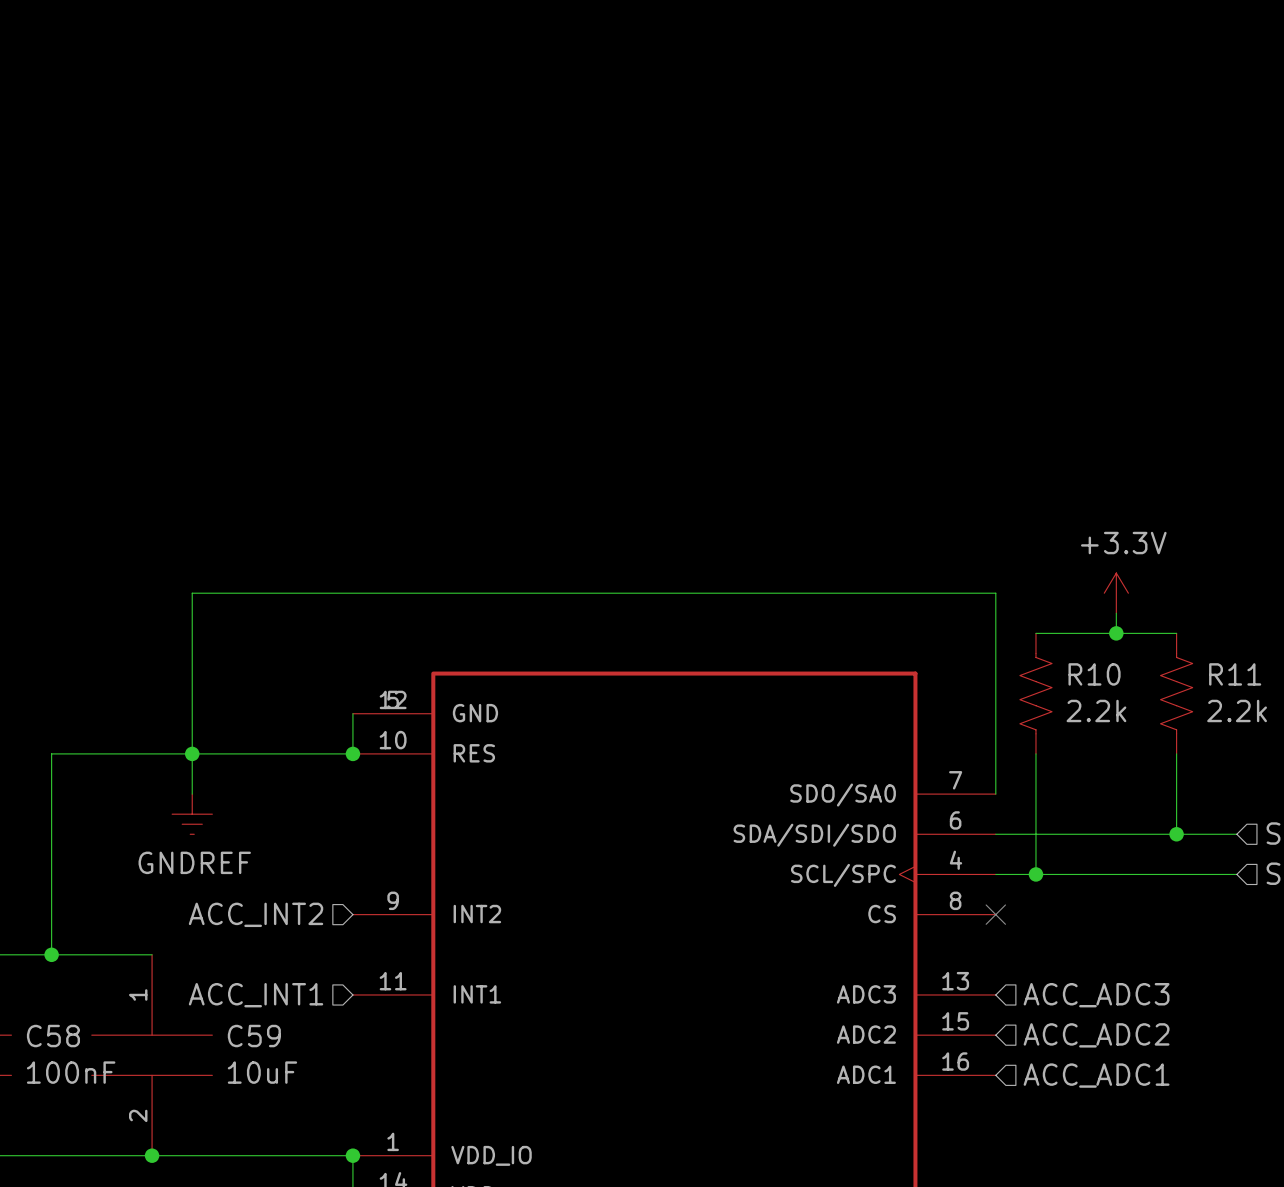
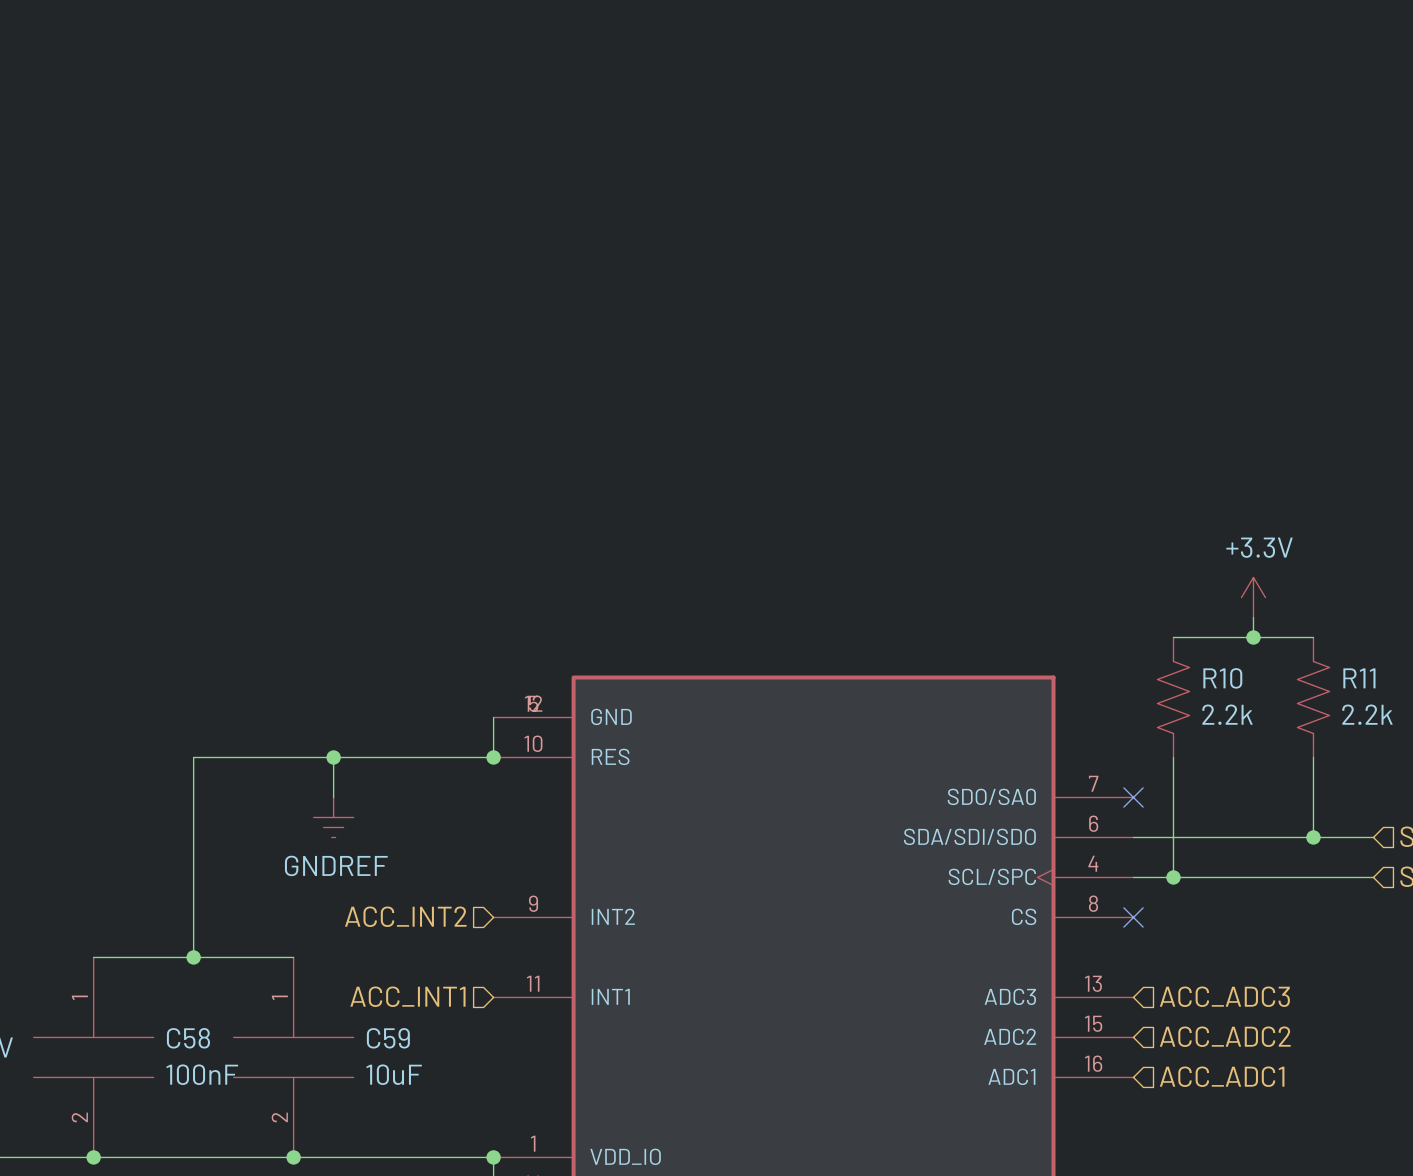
wire: (192, 753) (192, 593) (995, 593) (995, 794) -> none
no-connect mark: none -> (1133, 797)

